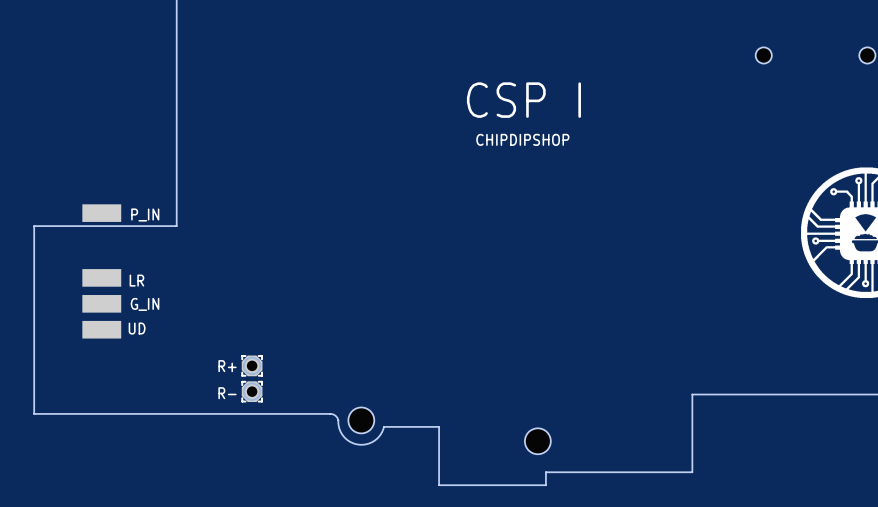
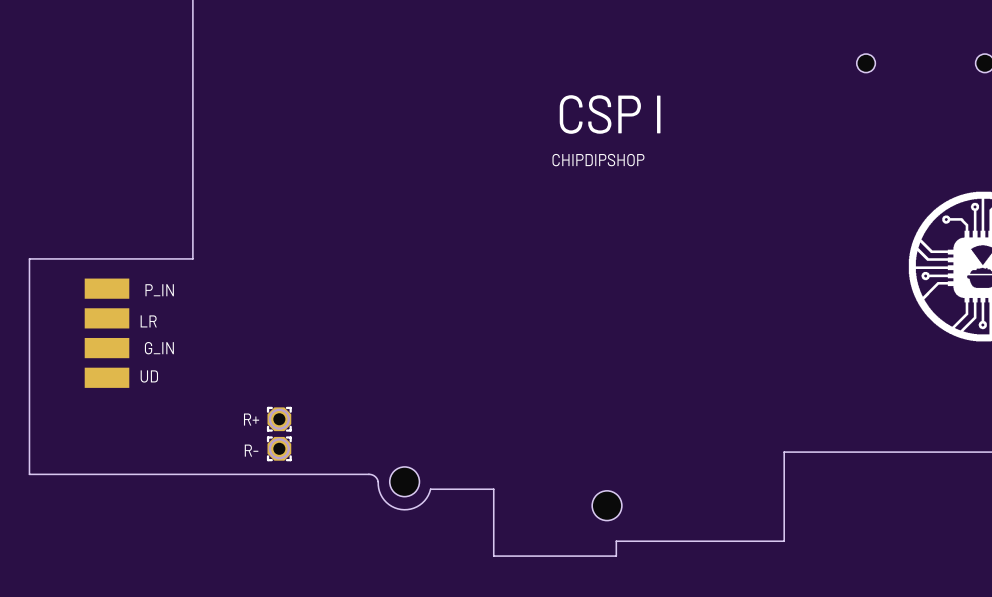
P_IN position: (101, 213) -> (106, 288)

